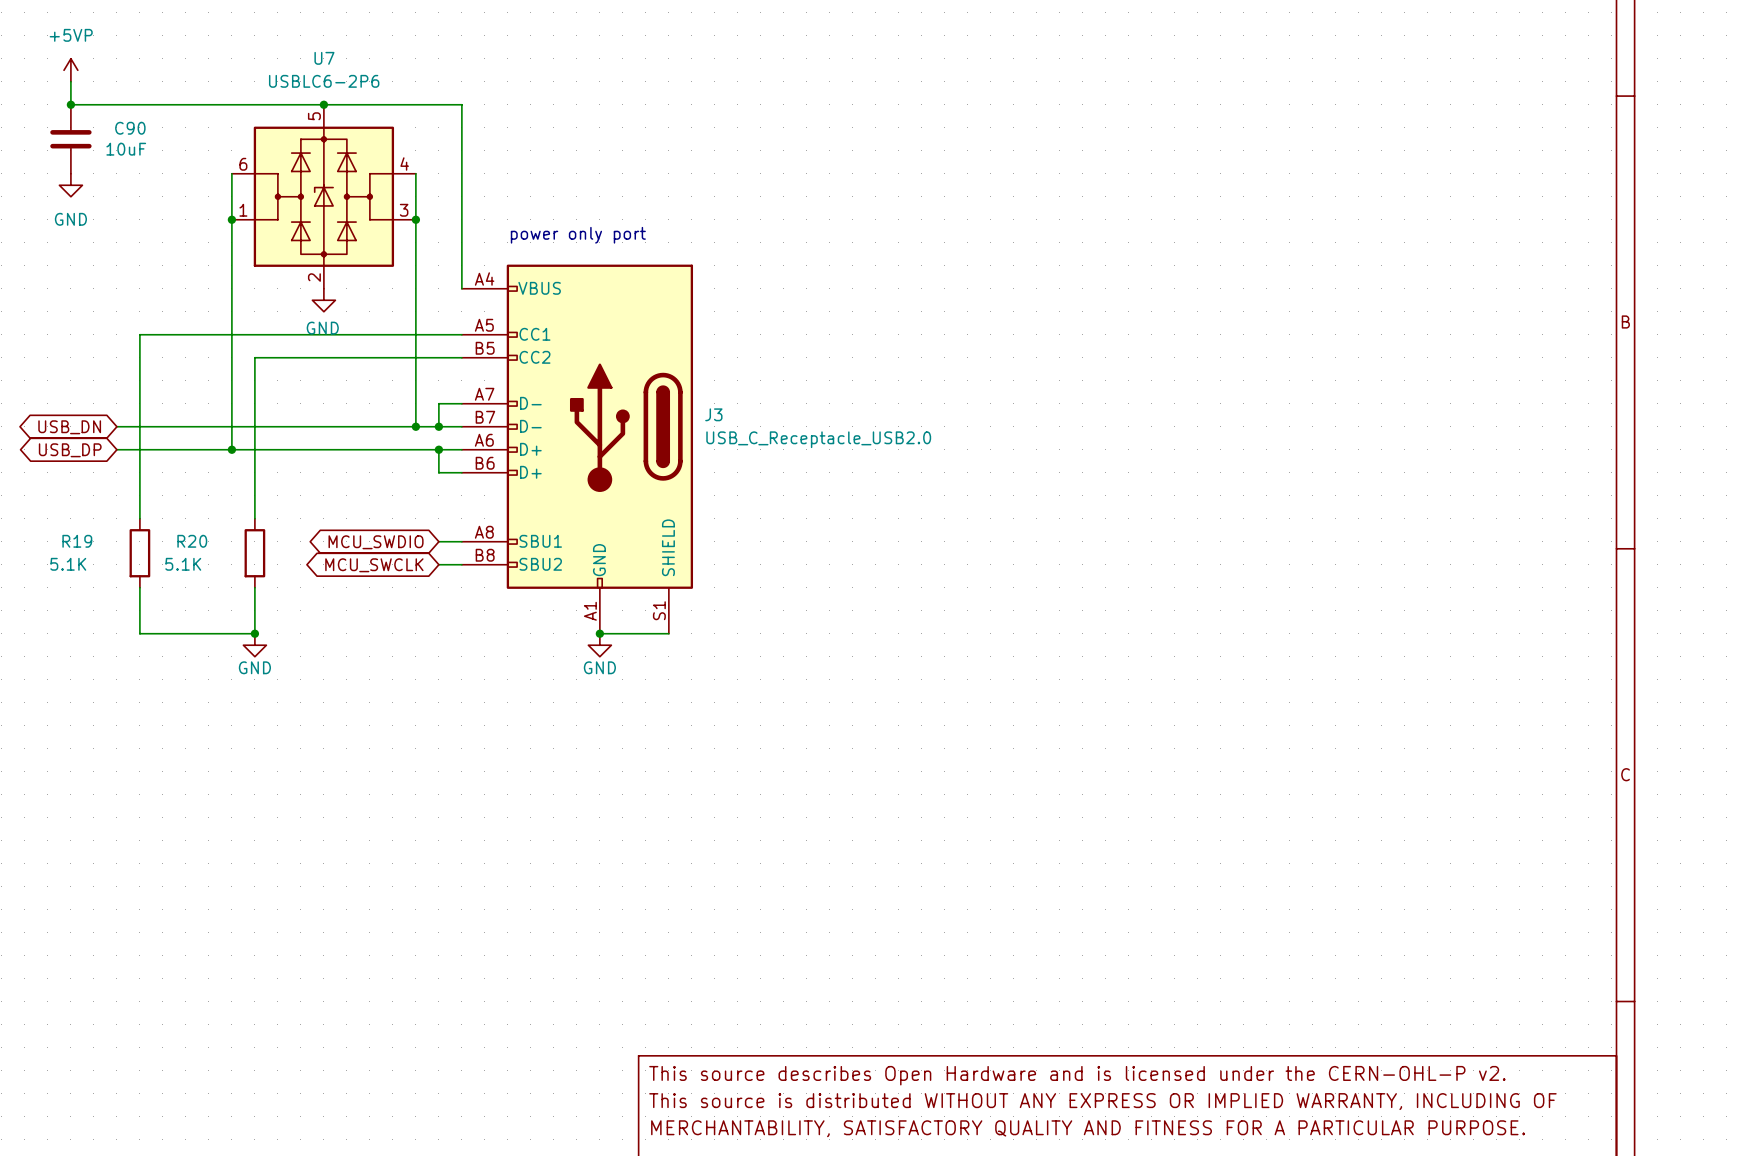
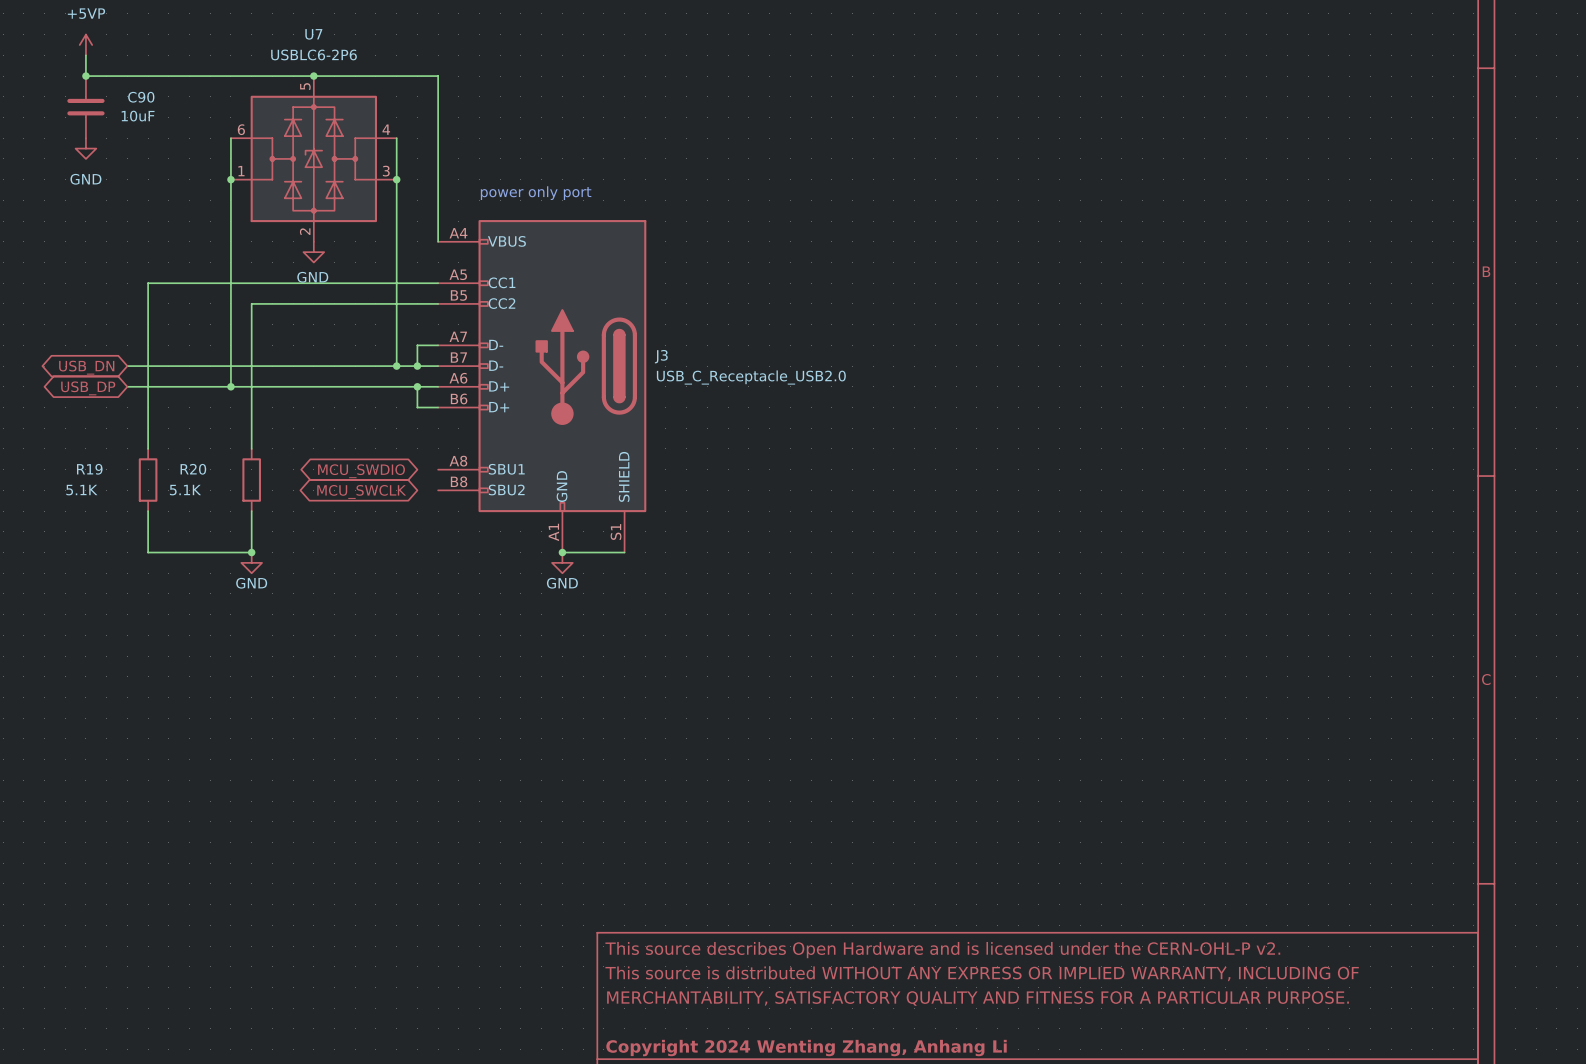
wire: (438, 541) (461, 541) -> none
wire: (438, 564) (461, 564) -> none

